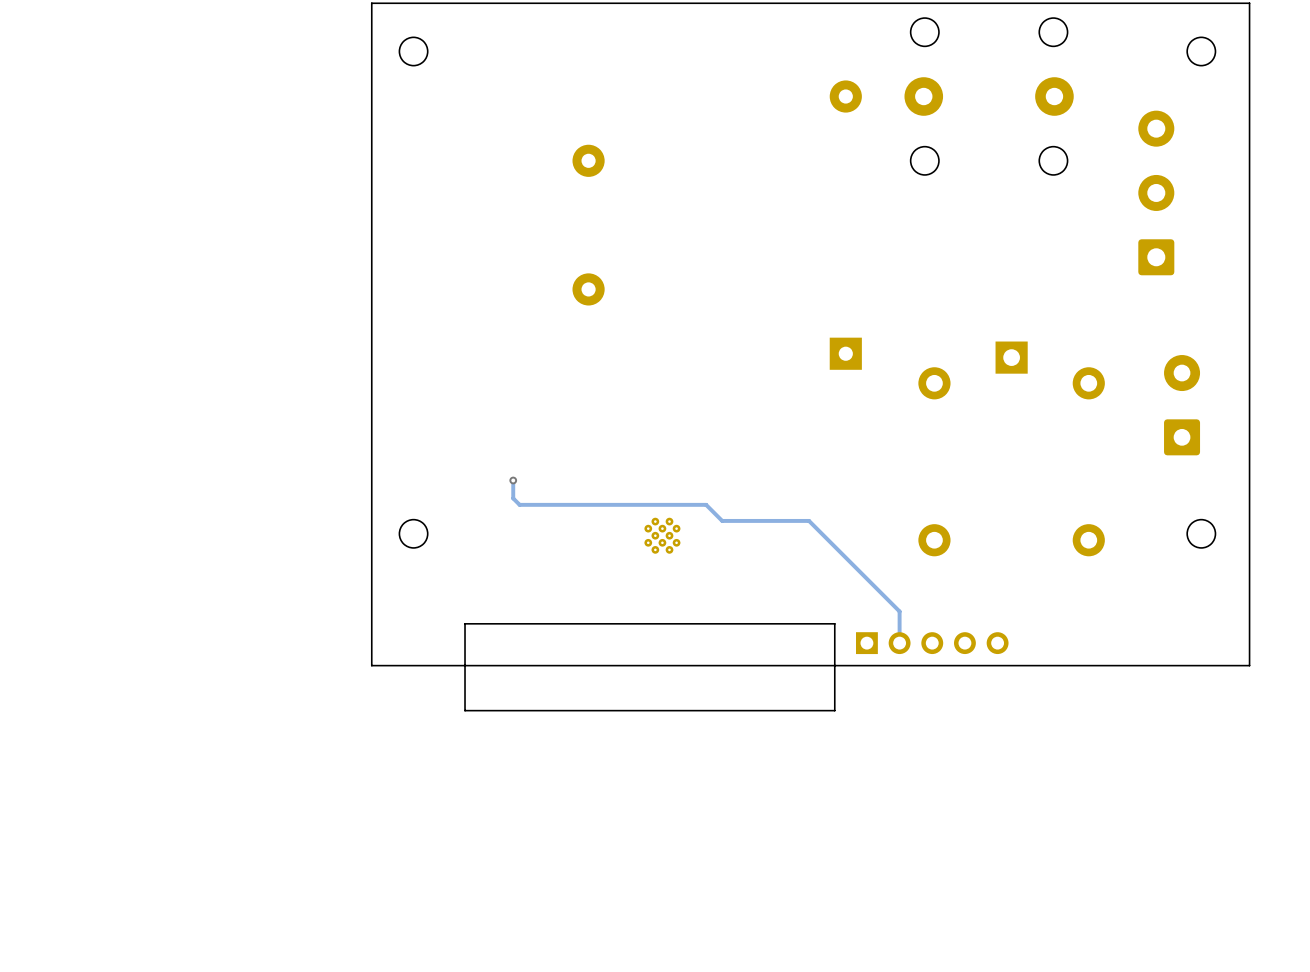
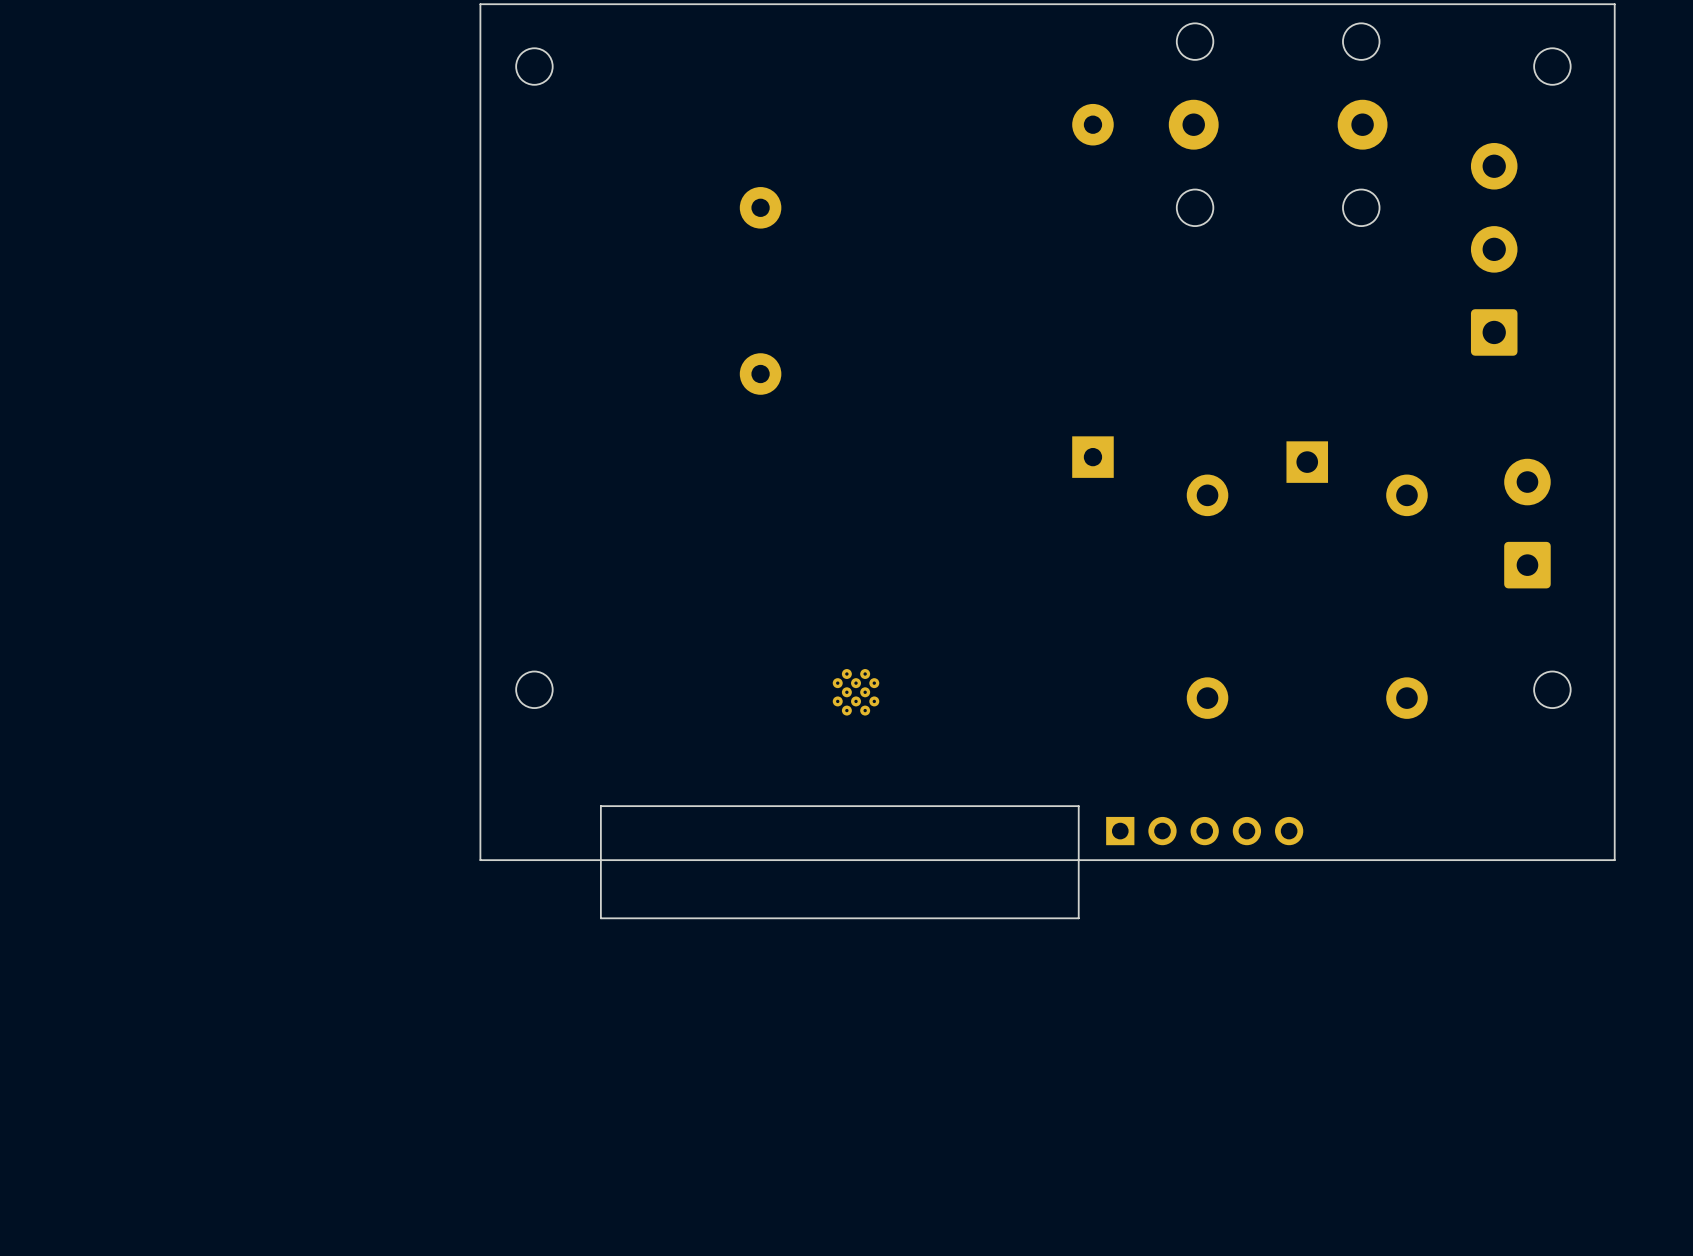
track: (513, 479) (513, 498) (519, 504) (706, 504) (722, 520) (809, 520) (899, 611) (899, 643) -> none
via: (513, 480) -> none

